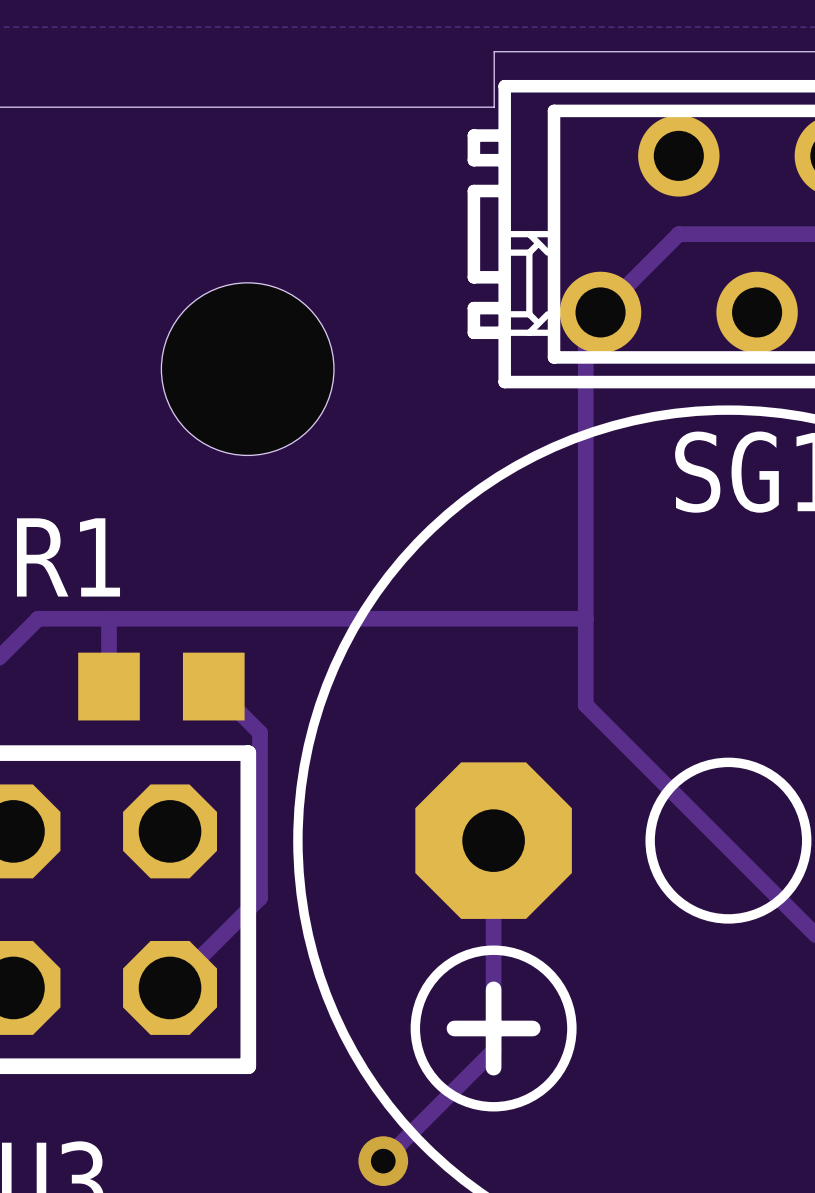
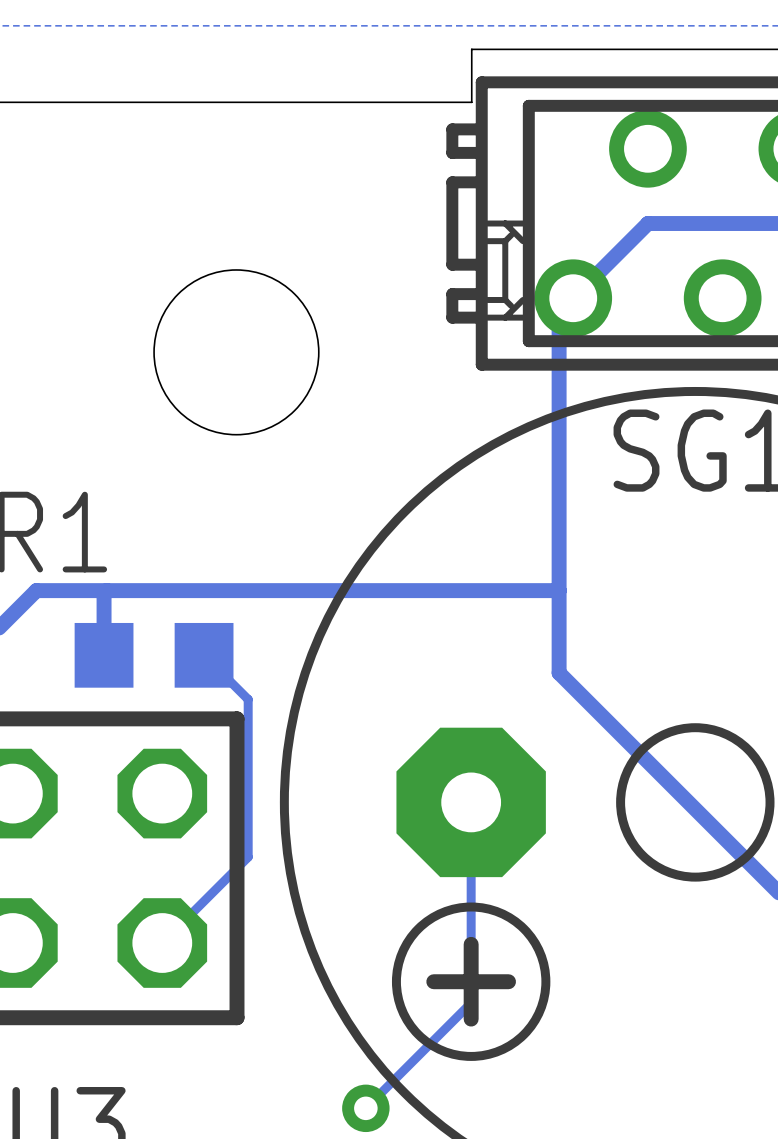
track width: thick (213, 686) (260, 732) (260, 897) (170, 987) -> thin (204, 655) (248, 699) (248, 857) (162, 943)
track width: thick (493, 840) (493, 1050) (383, 1161) -> thin (471, 802) (471, 1003) (365, 1108)

